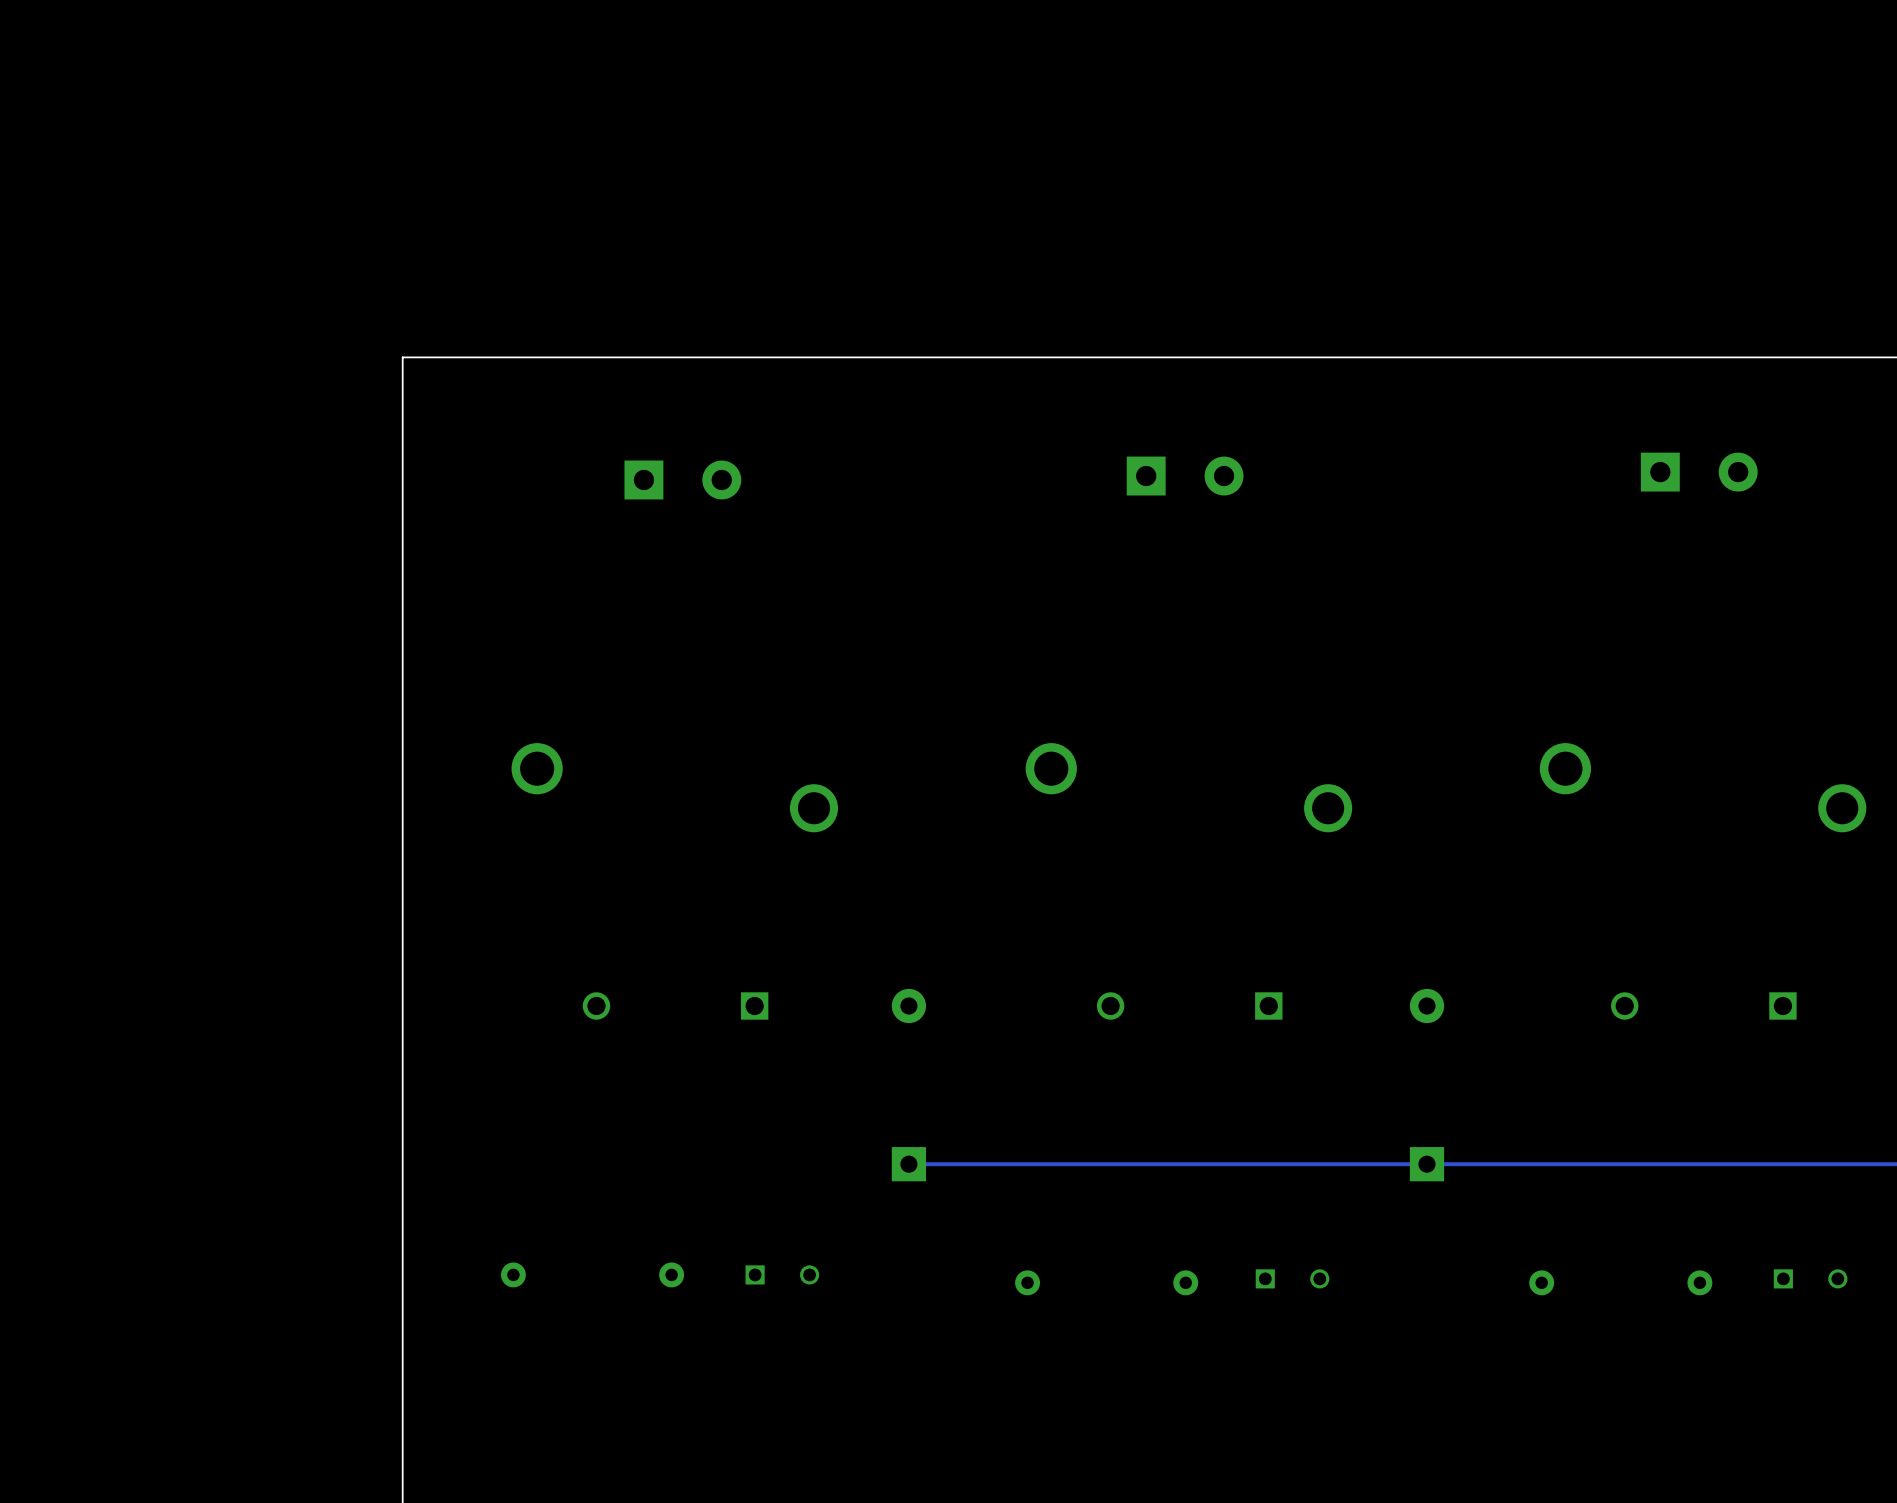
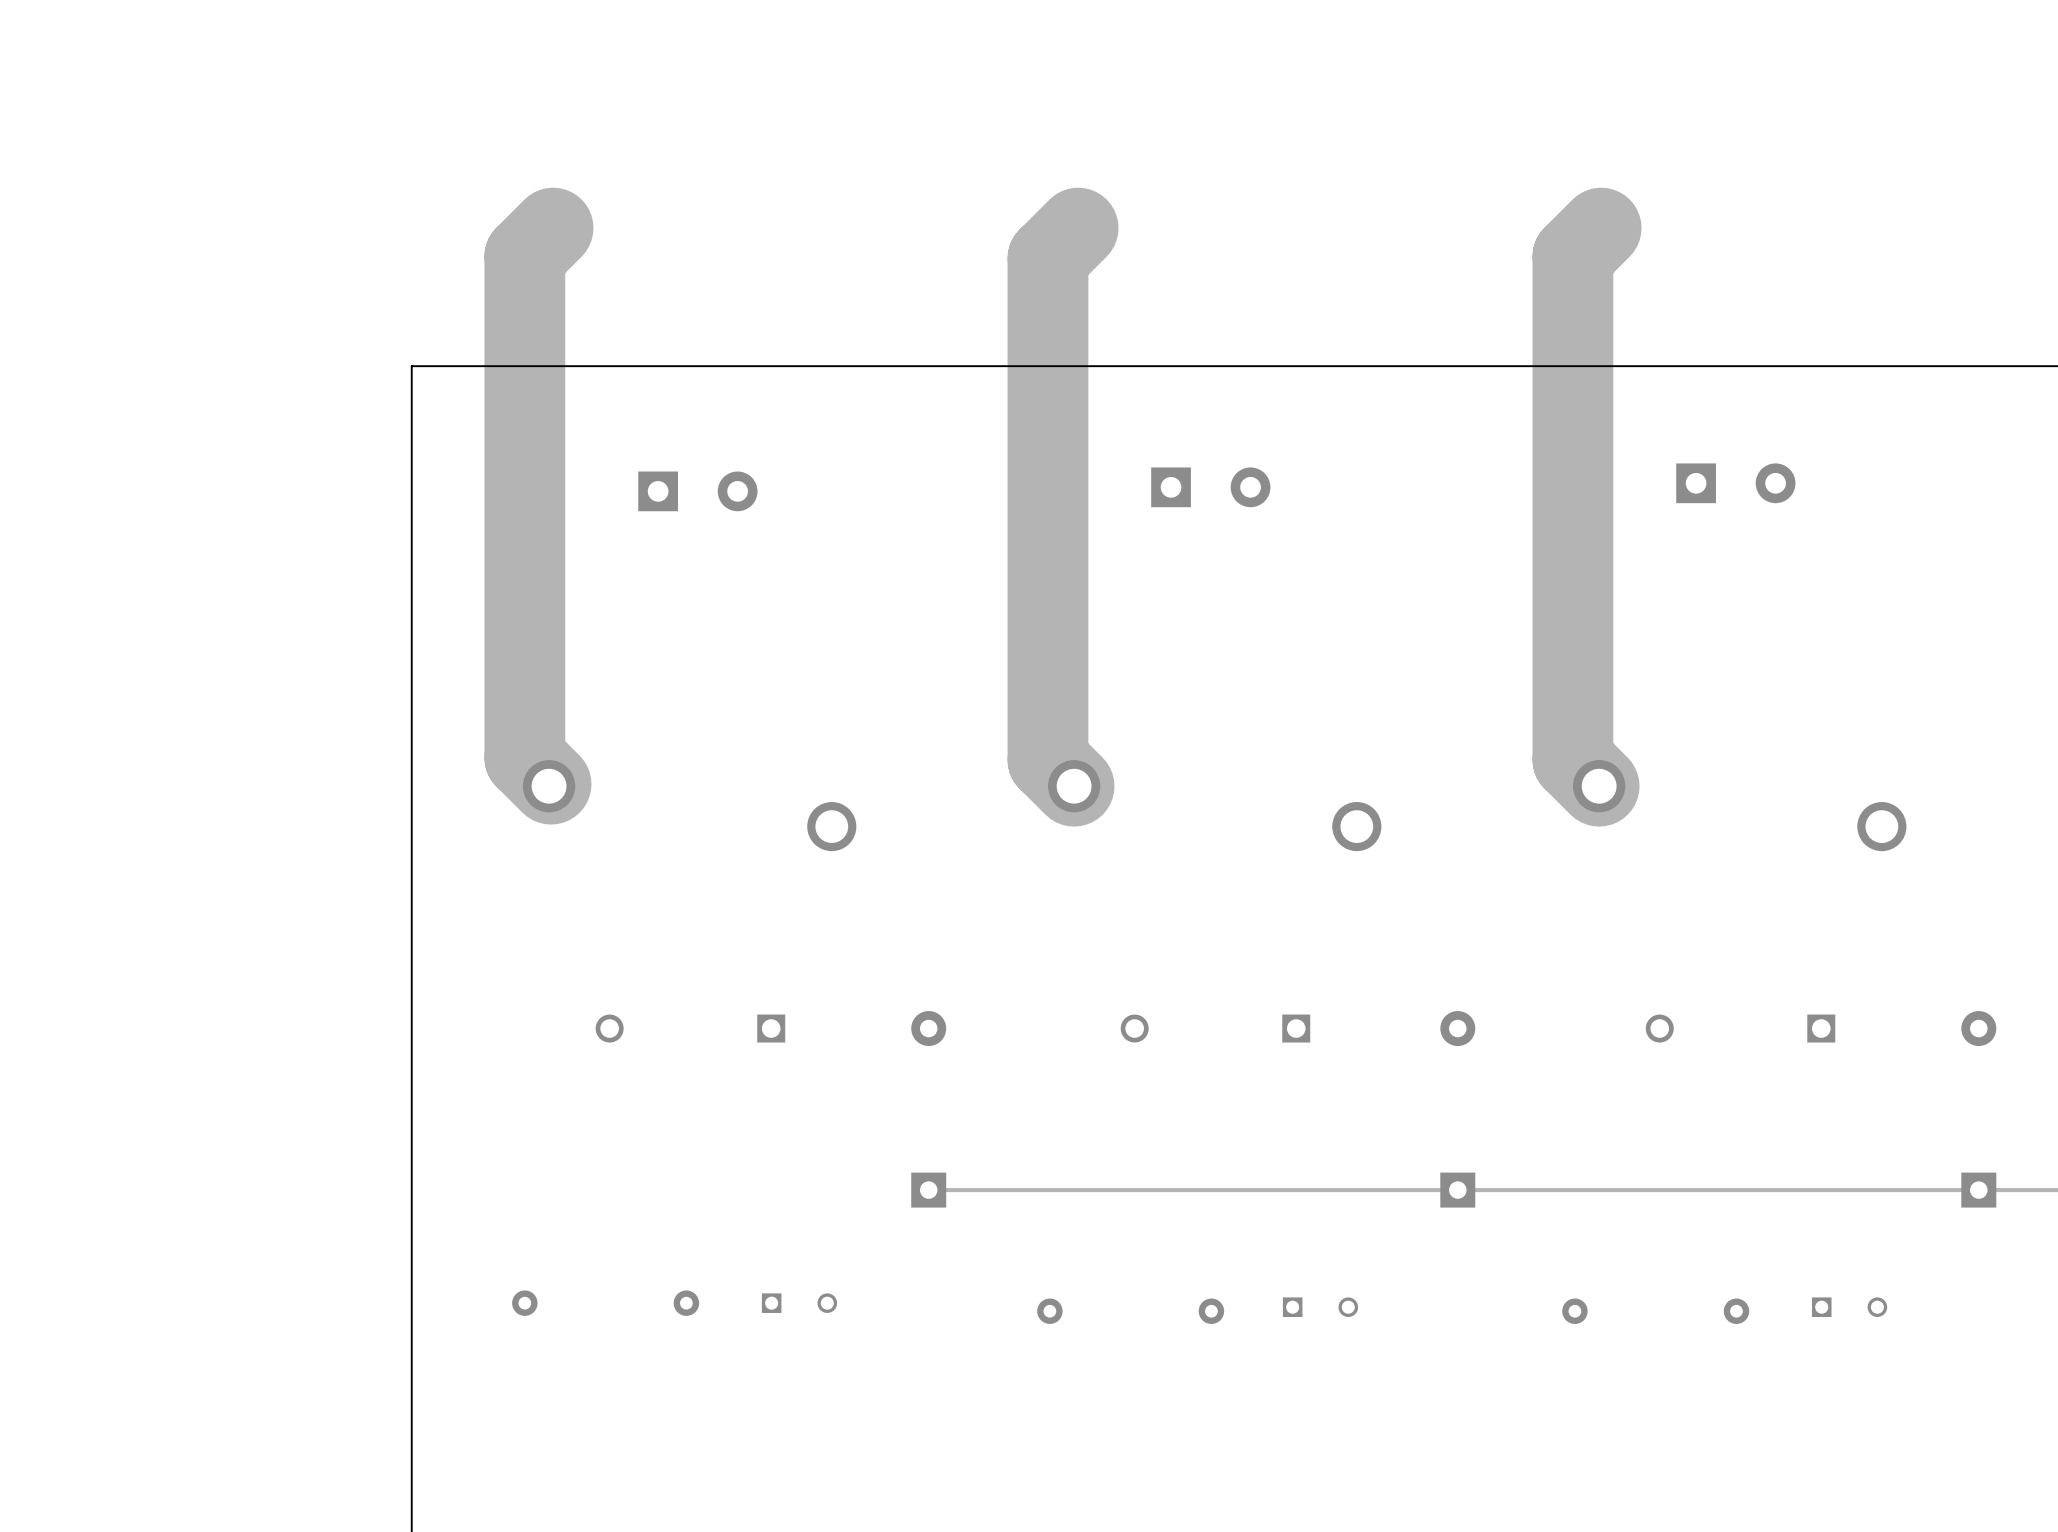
track: none -> (553, 228) (524, 256) (524, 757) (551, 784)
track: none -> (1078, 228) (1047, 258) (1047, 760) (1074, 786)
track: none -> (1601, 228) (1572, 256) (1572, 759) (1599, 786)

